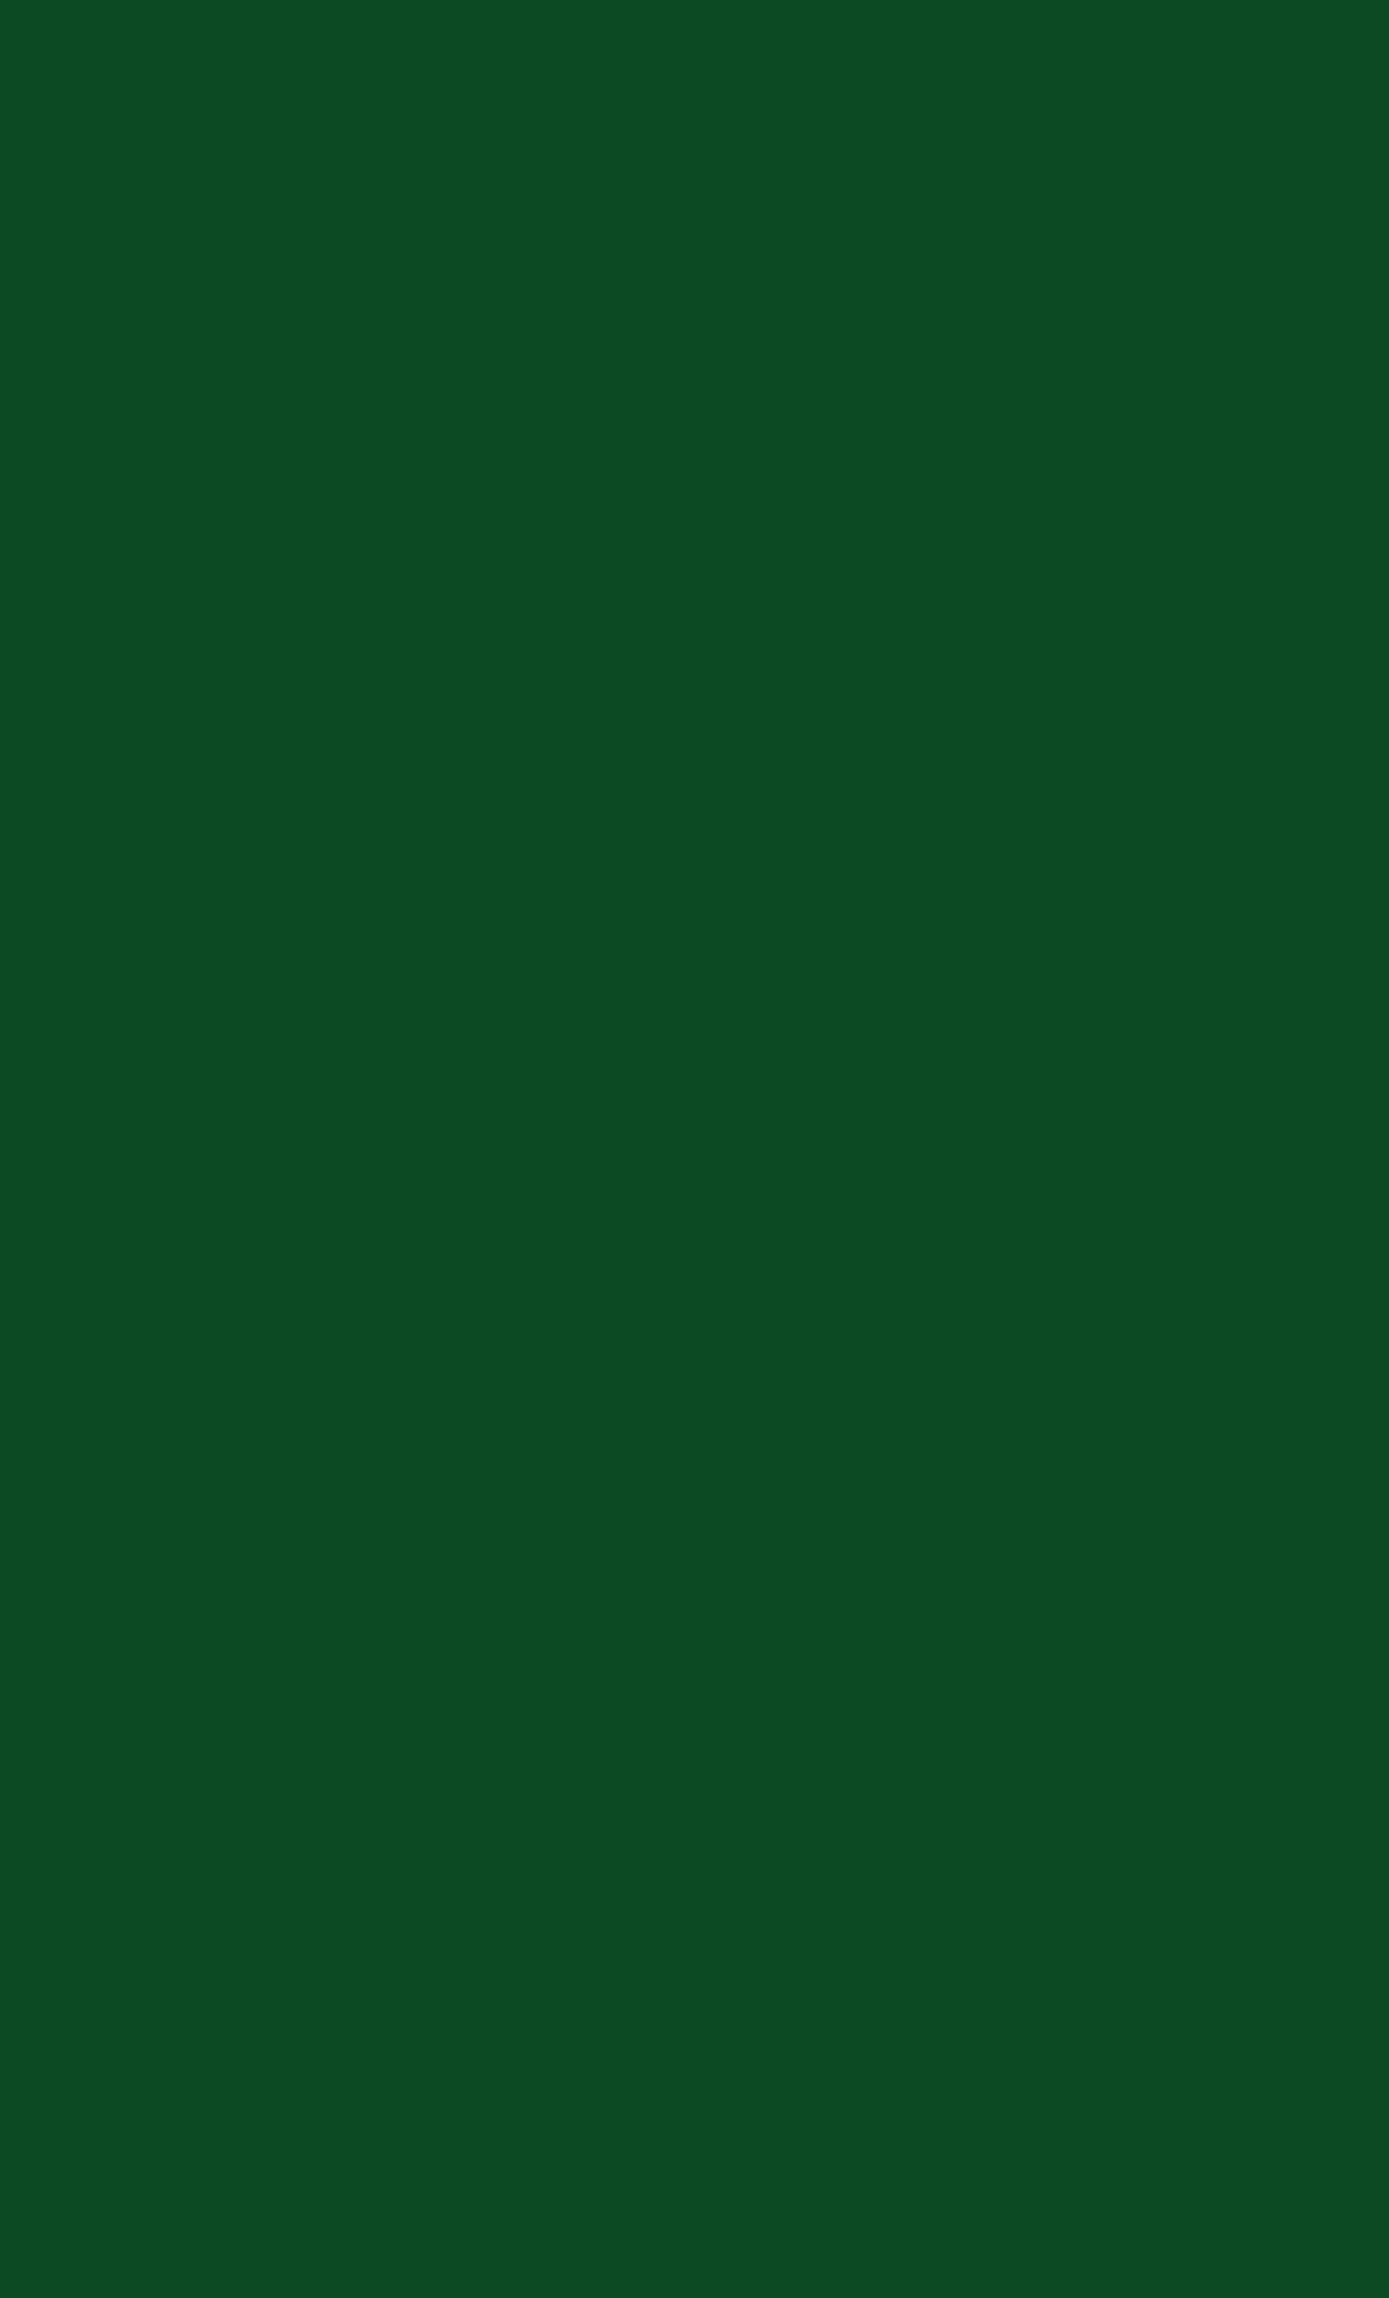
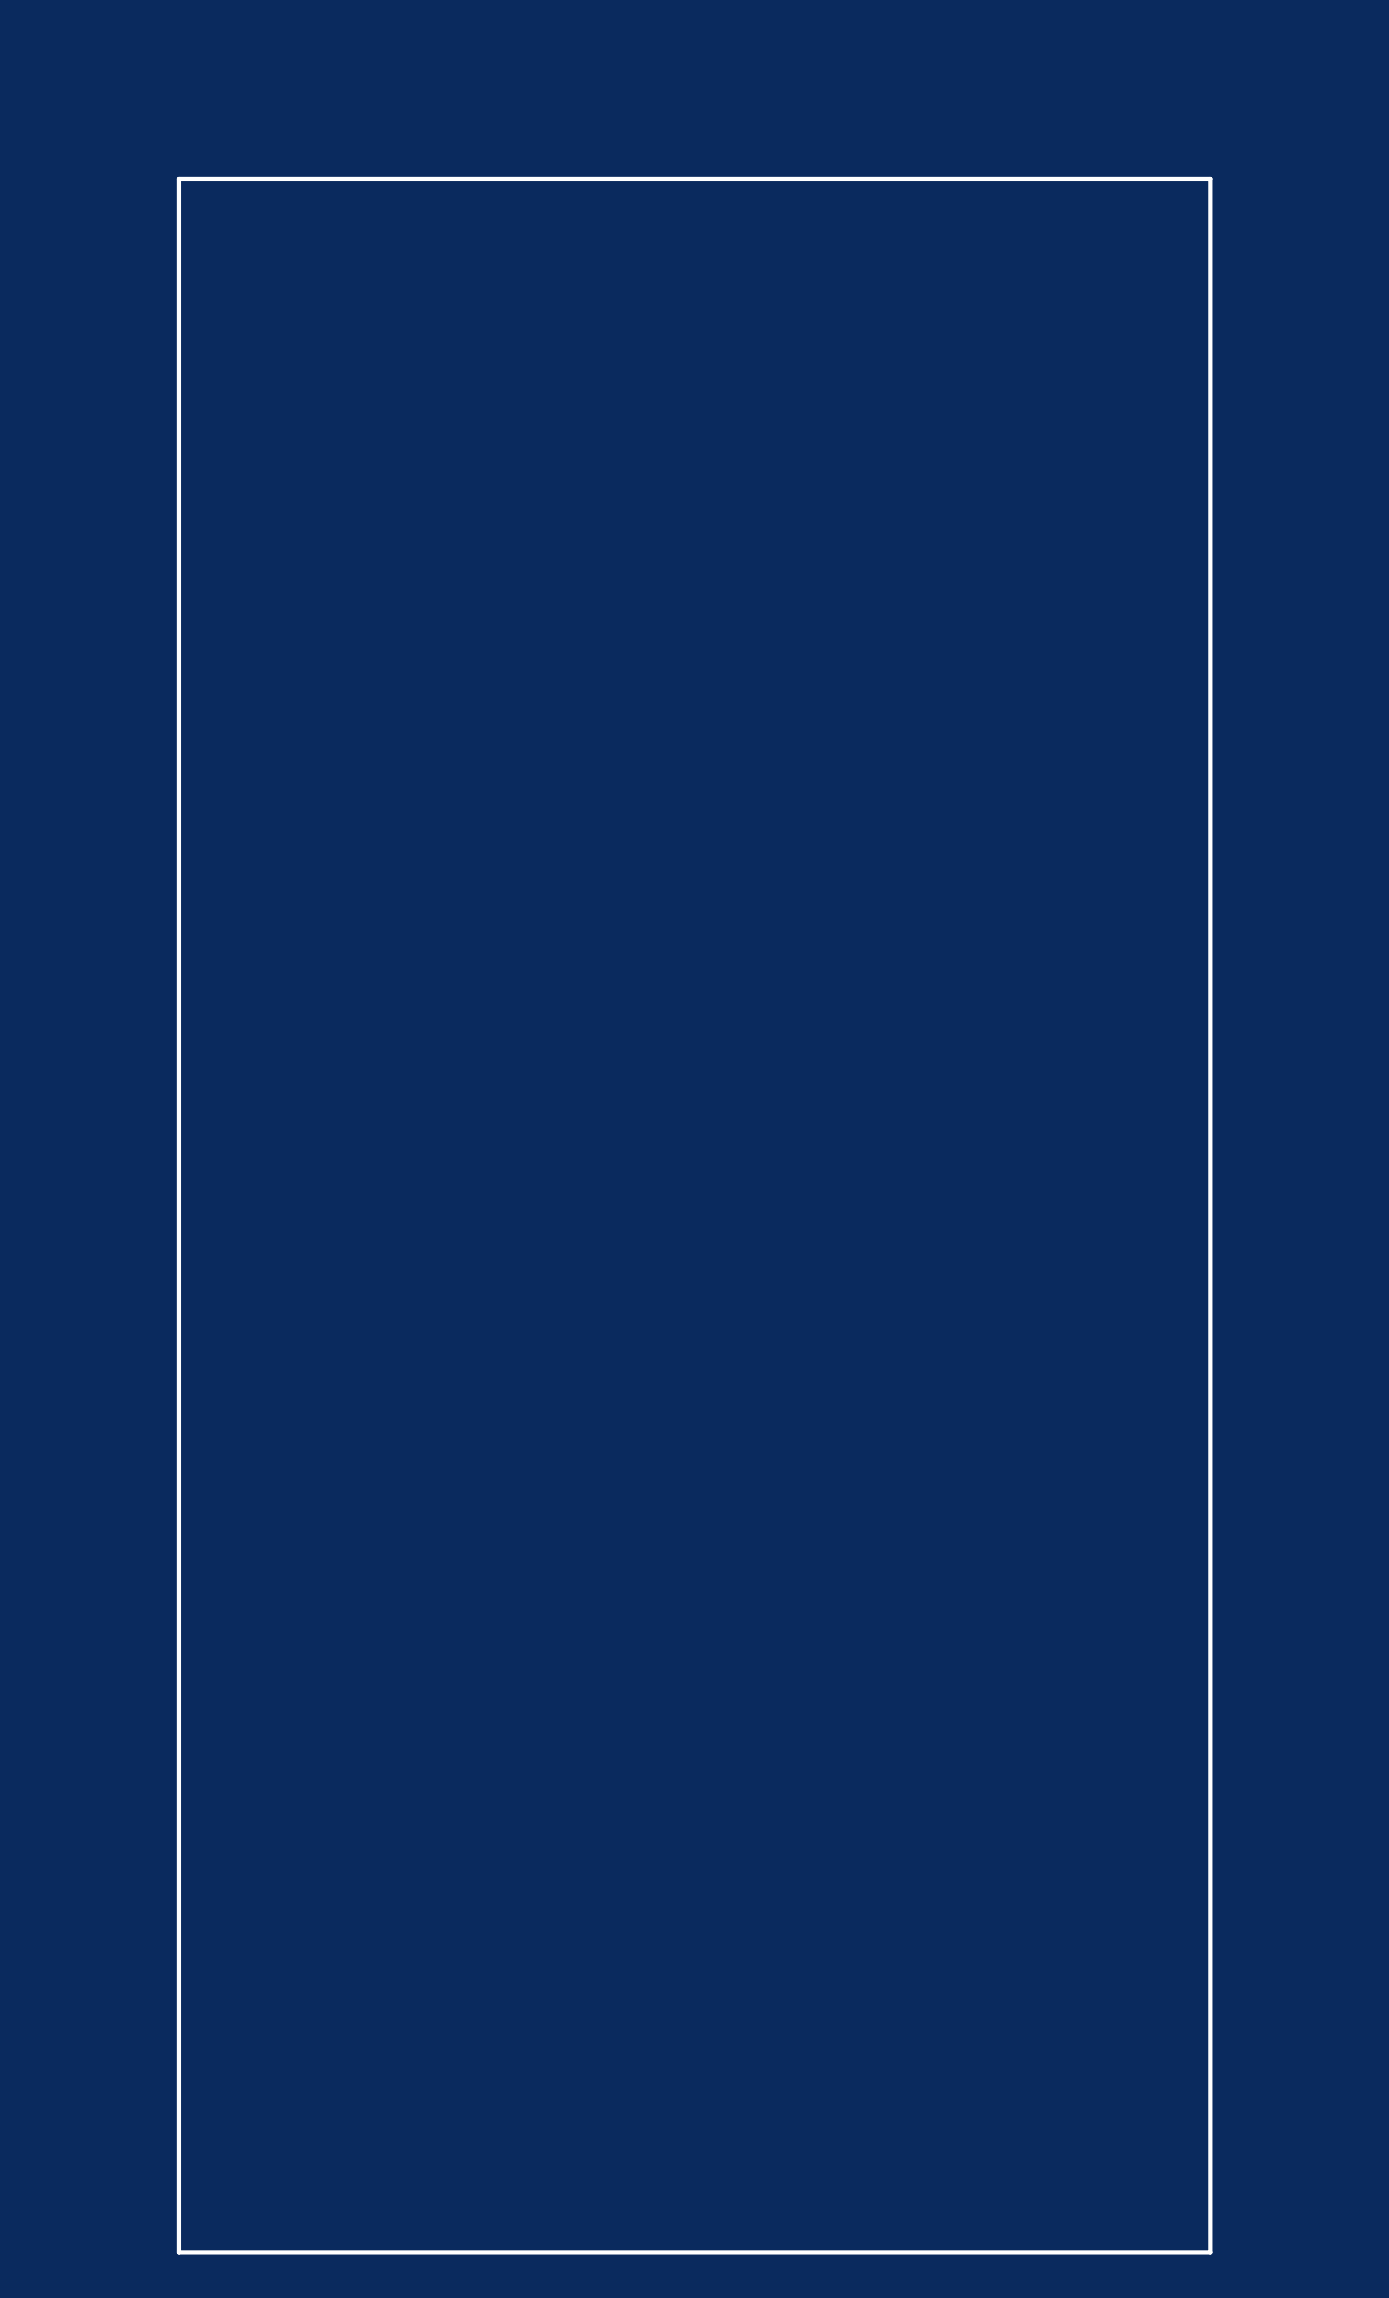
line: none -> (178, 178) (1210, 178) (1210, 2252) (178, 2252) (178, 178)

